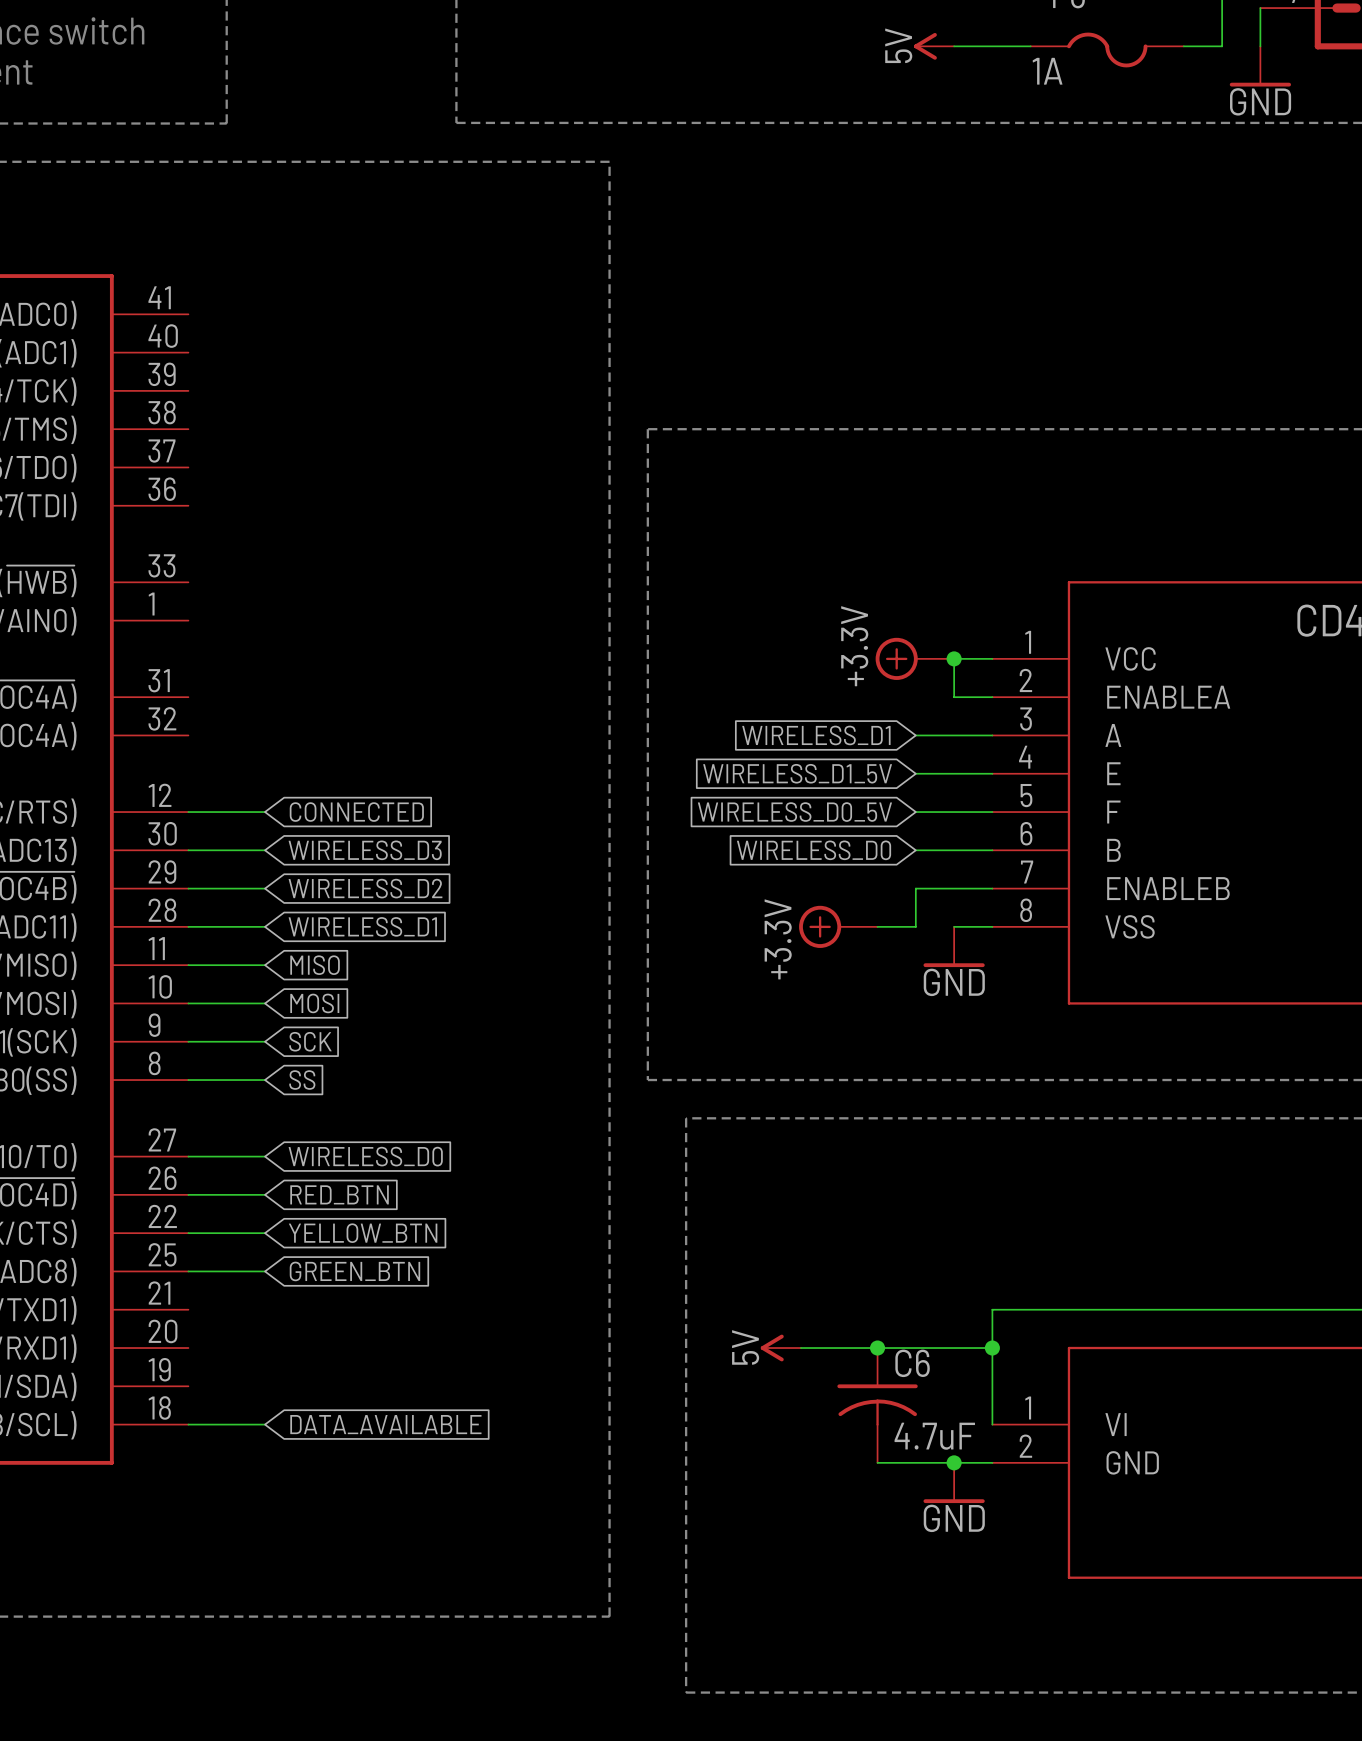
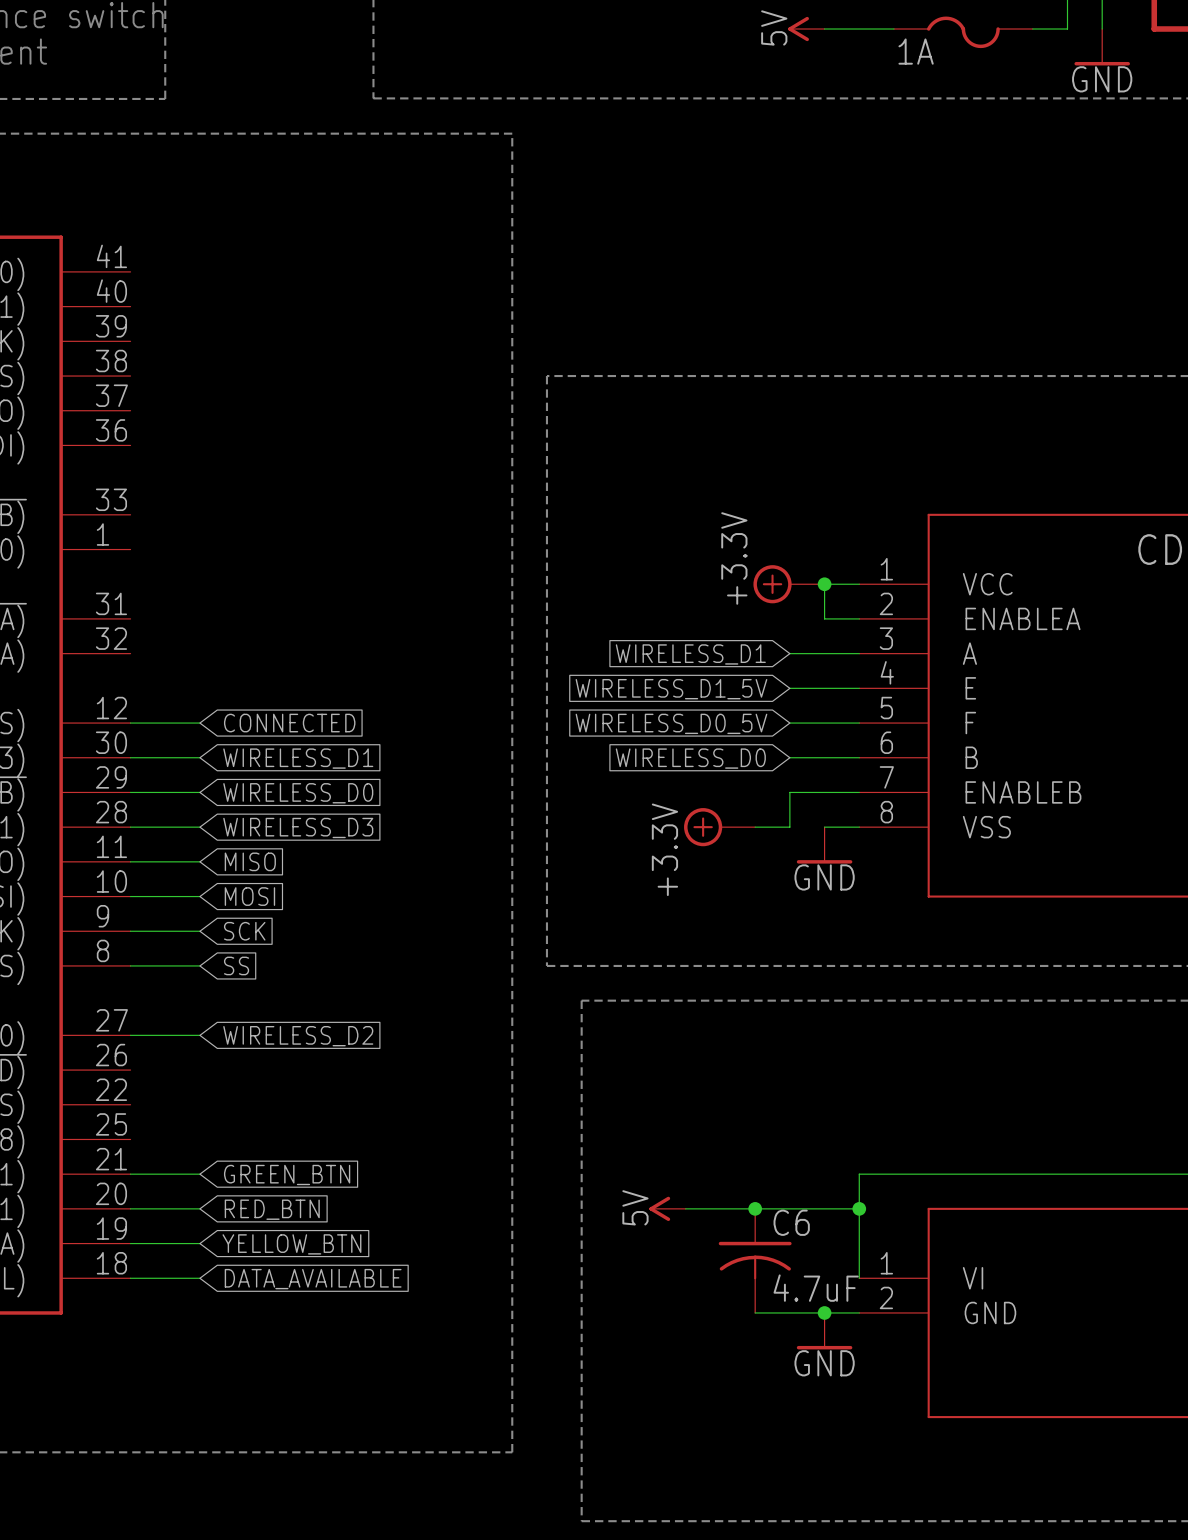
global label: WIRELESS_D3 (365, 850) -> WIRELESS_D1 (298, 758)
global label: WIRELESS_D2 (365, 888) -> WIRELESS_D0 (298, 793)
global label: WIRELESS_D1 (362, 926) -> WIRELESS_D3 (298, 827)
global label: WIRELESS_D0 (365, 1156) -> WIRELESS_D2 (298, 1036)
wire: (188, 1194) (265, 1194) -> (130, 1174) (199, 1174)
global label position: RED_BTN (339, 1194) -> RED_BTN (272, 1209)
wire: (188, 1233) (265, 1233) -> (130, 1208) (199, 1208)
global label position: YELLOW_BTN (363, 1233) -> YELLOW_BTN (291, 1244)
wire: (188, 1271) (265, 1271) -> (130, 1243) (199, 1243)
global label position: GREEN_BTN (354, 1271) -> GREEN_BTN (287, 1174)

